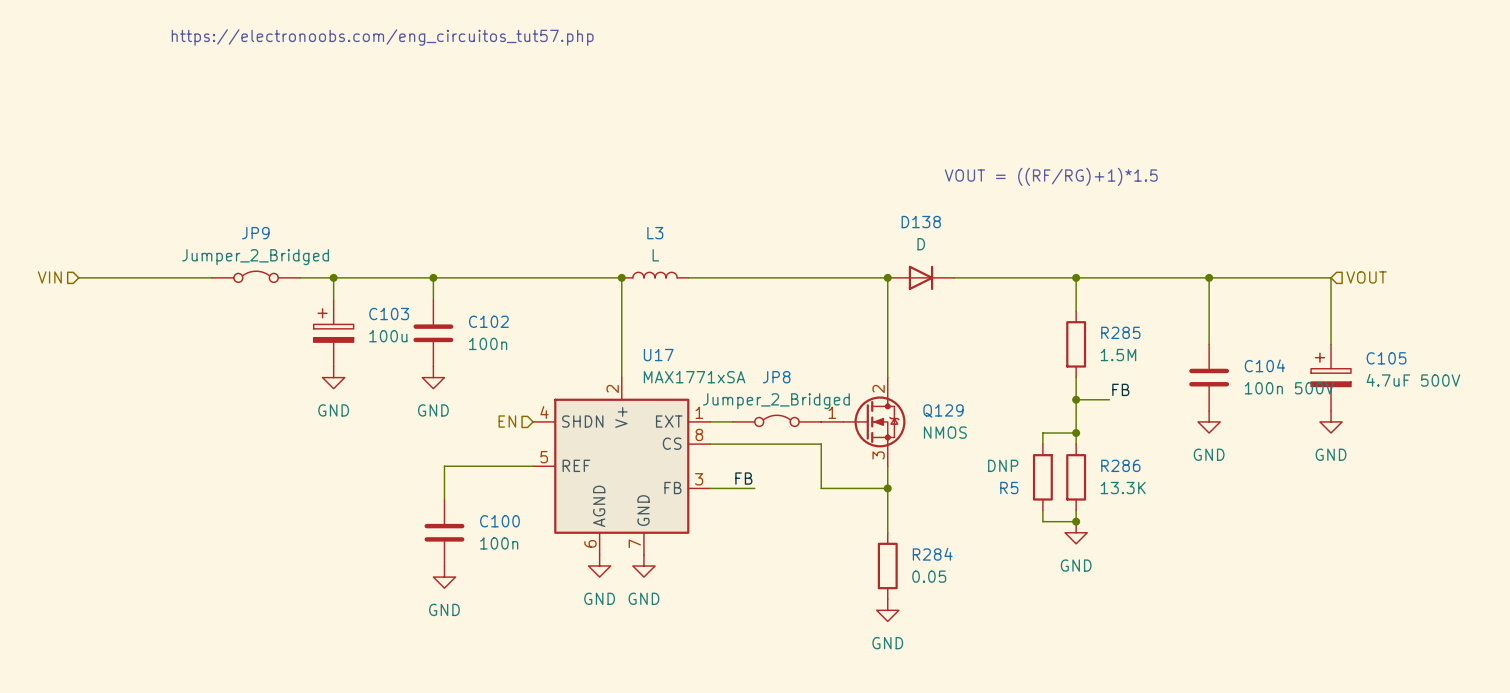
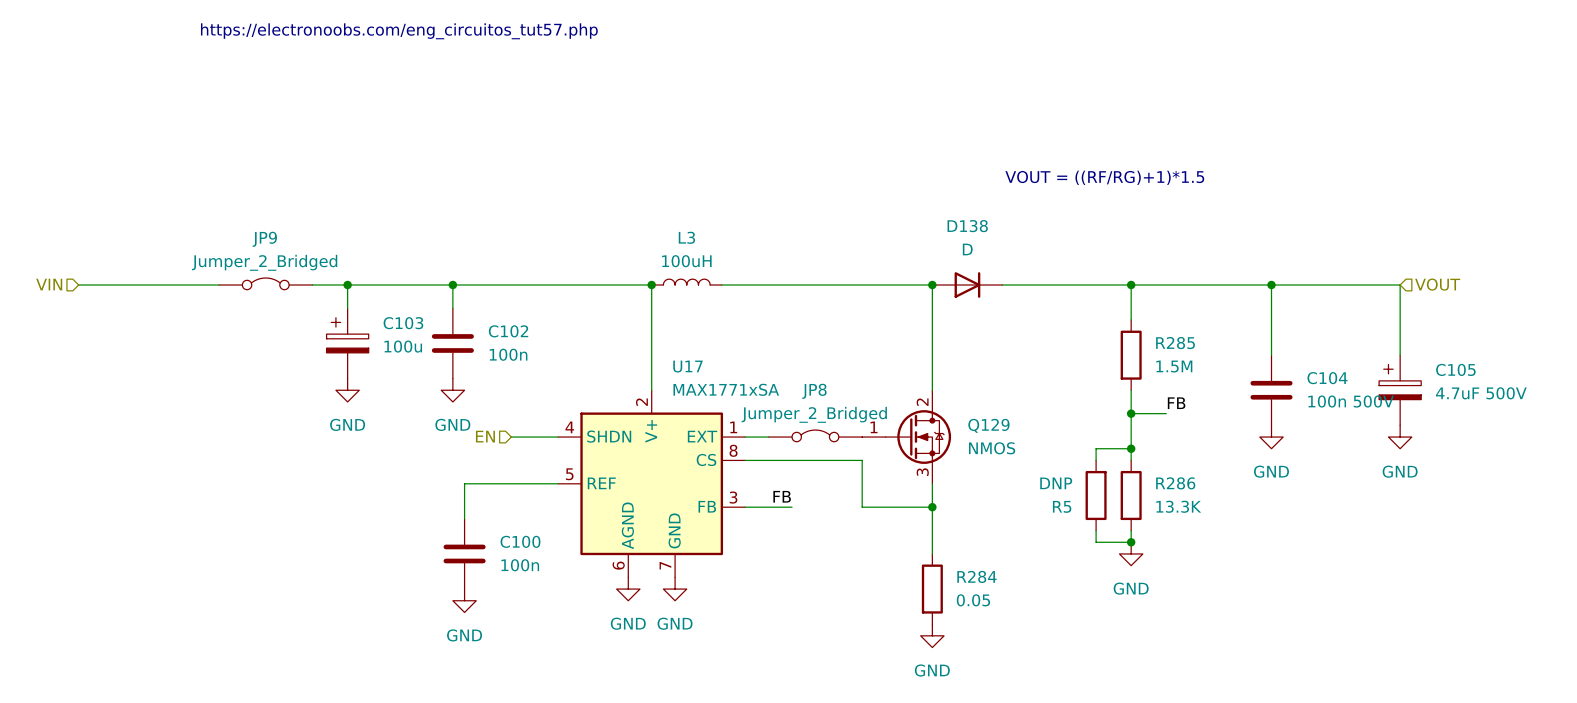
L3 value: L (655, 255) -> 100uH (686, 261)
wire: none -> (511, 437) (558, 437)
hierarchical label position: EN (507, 421) -> EN (485, 436)

